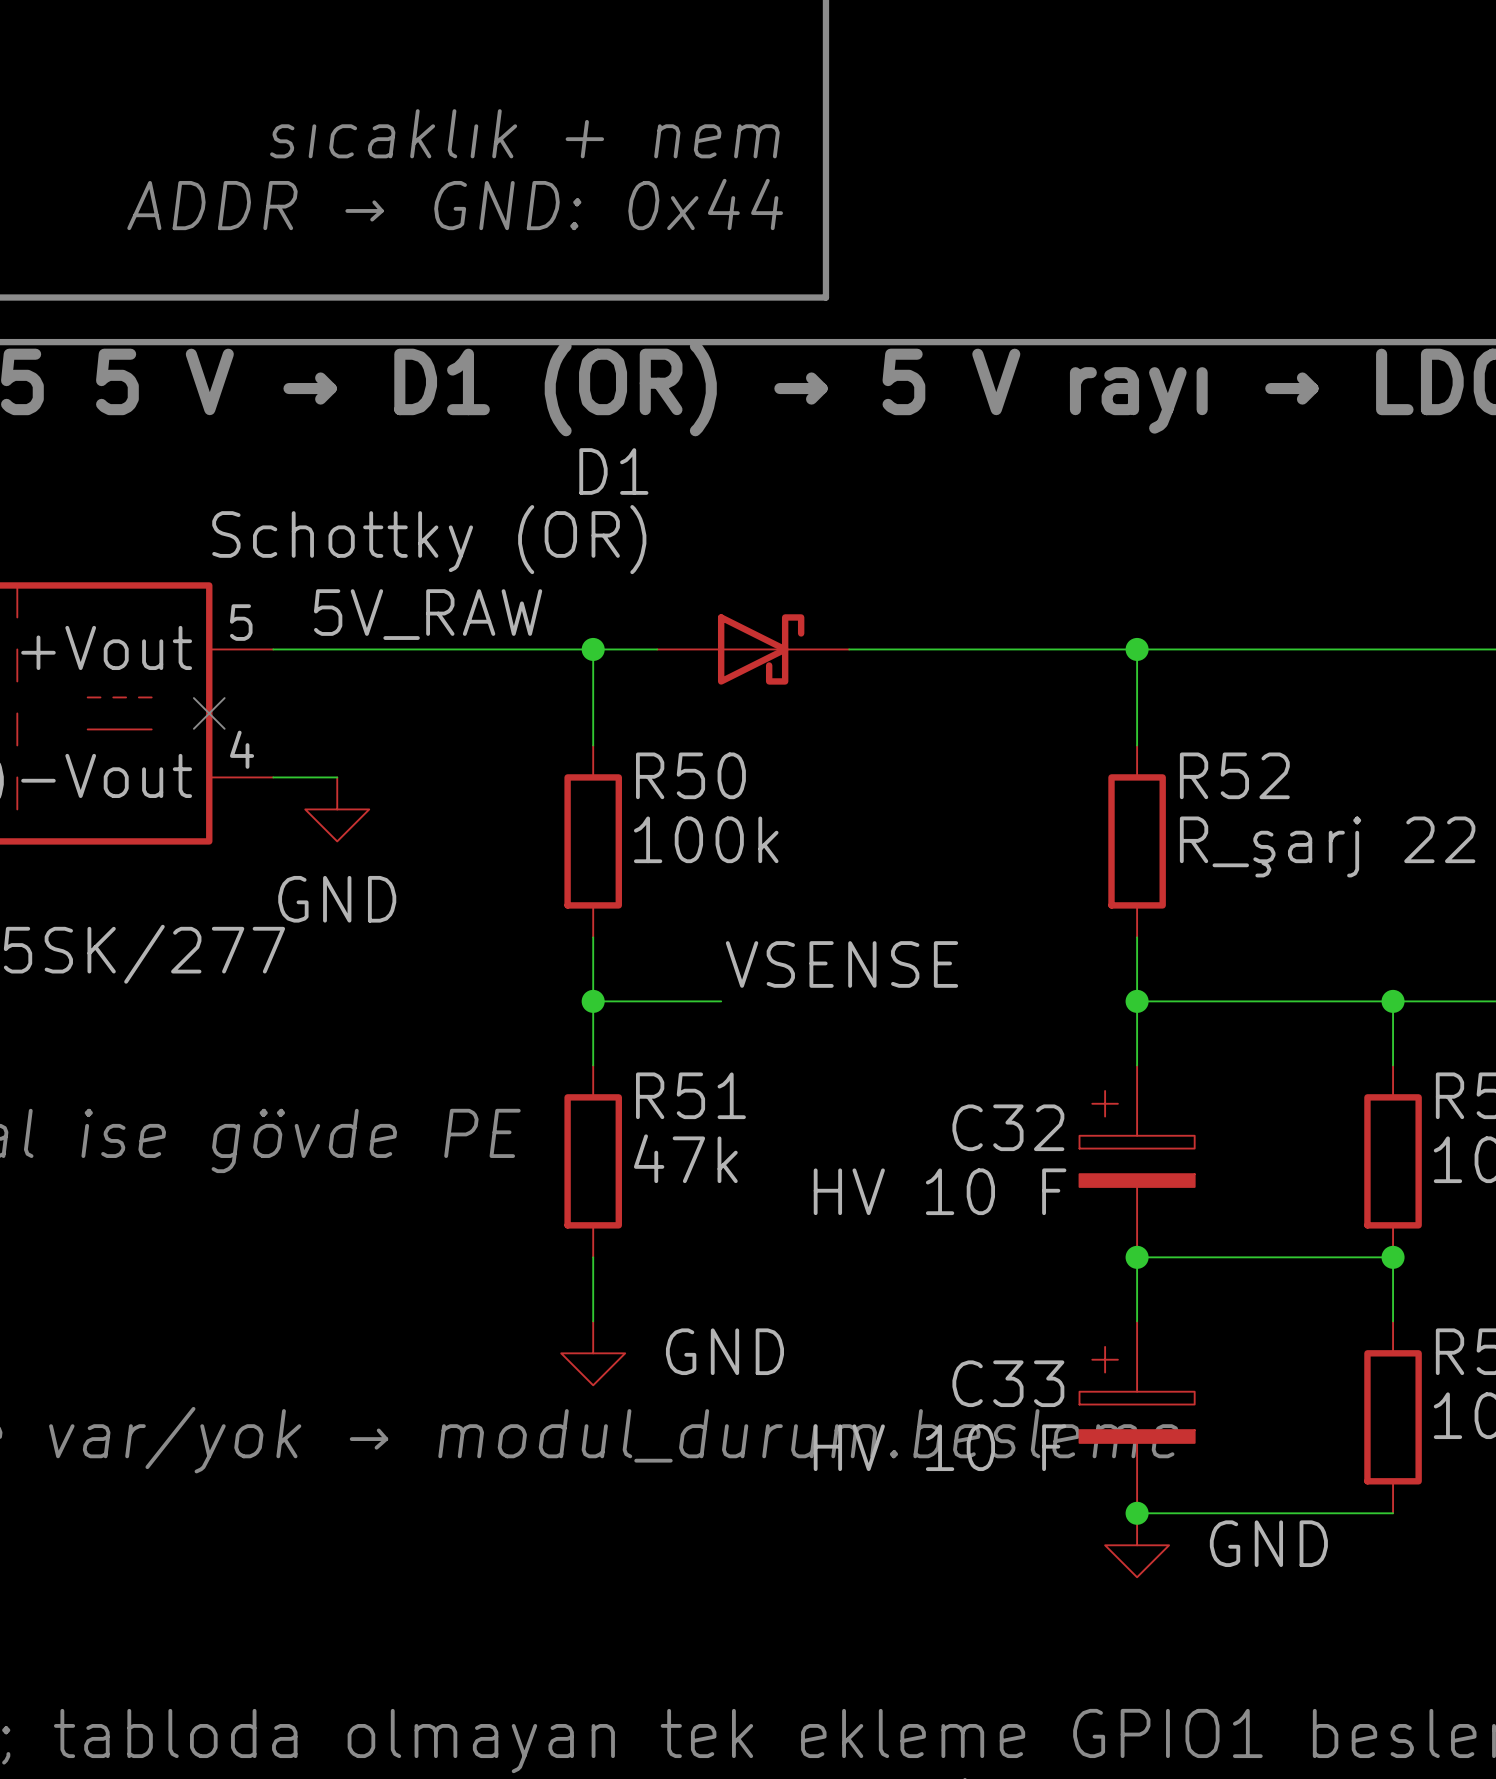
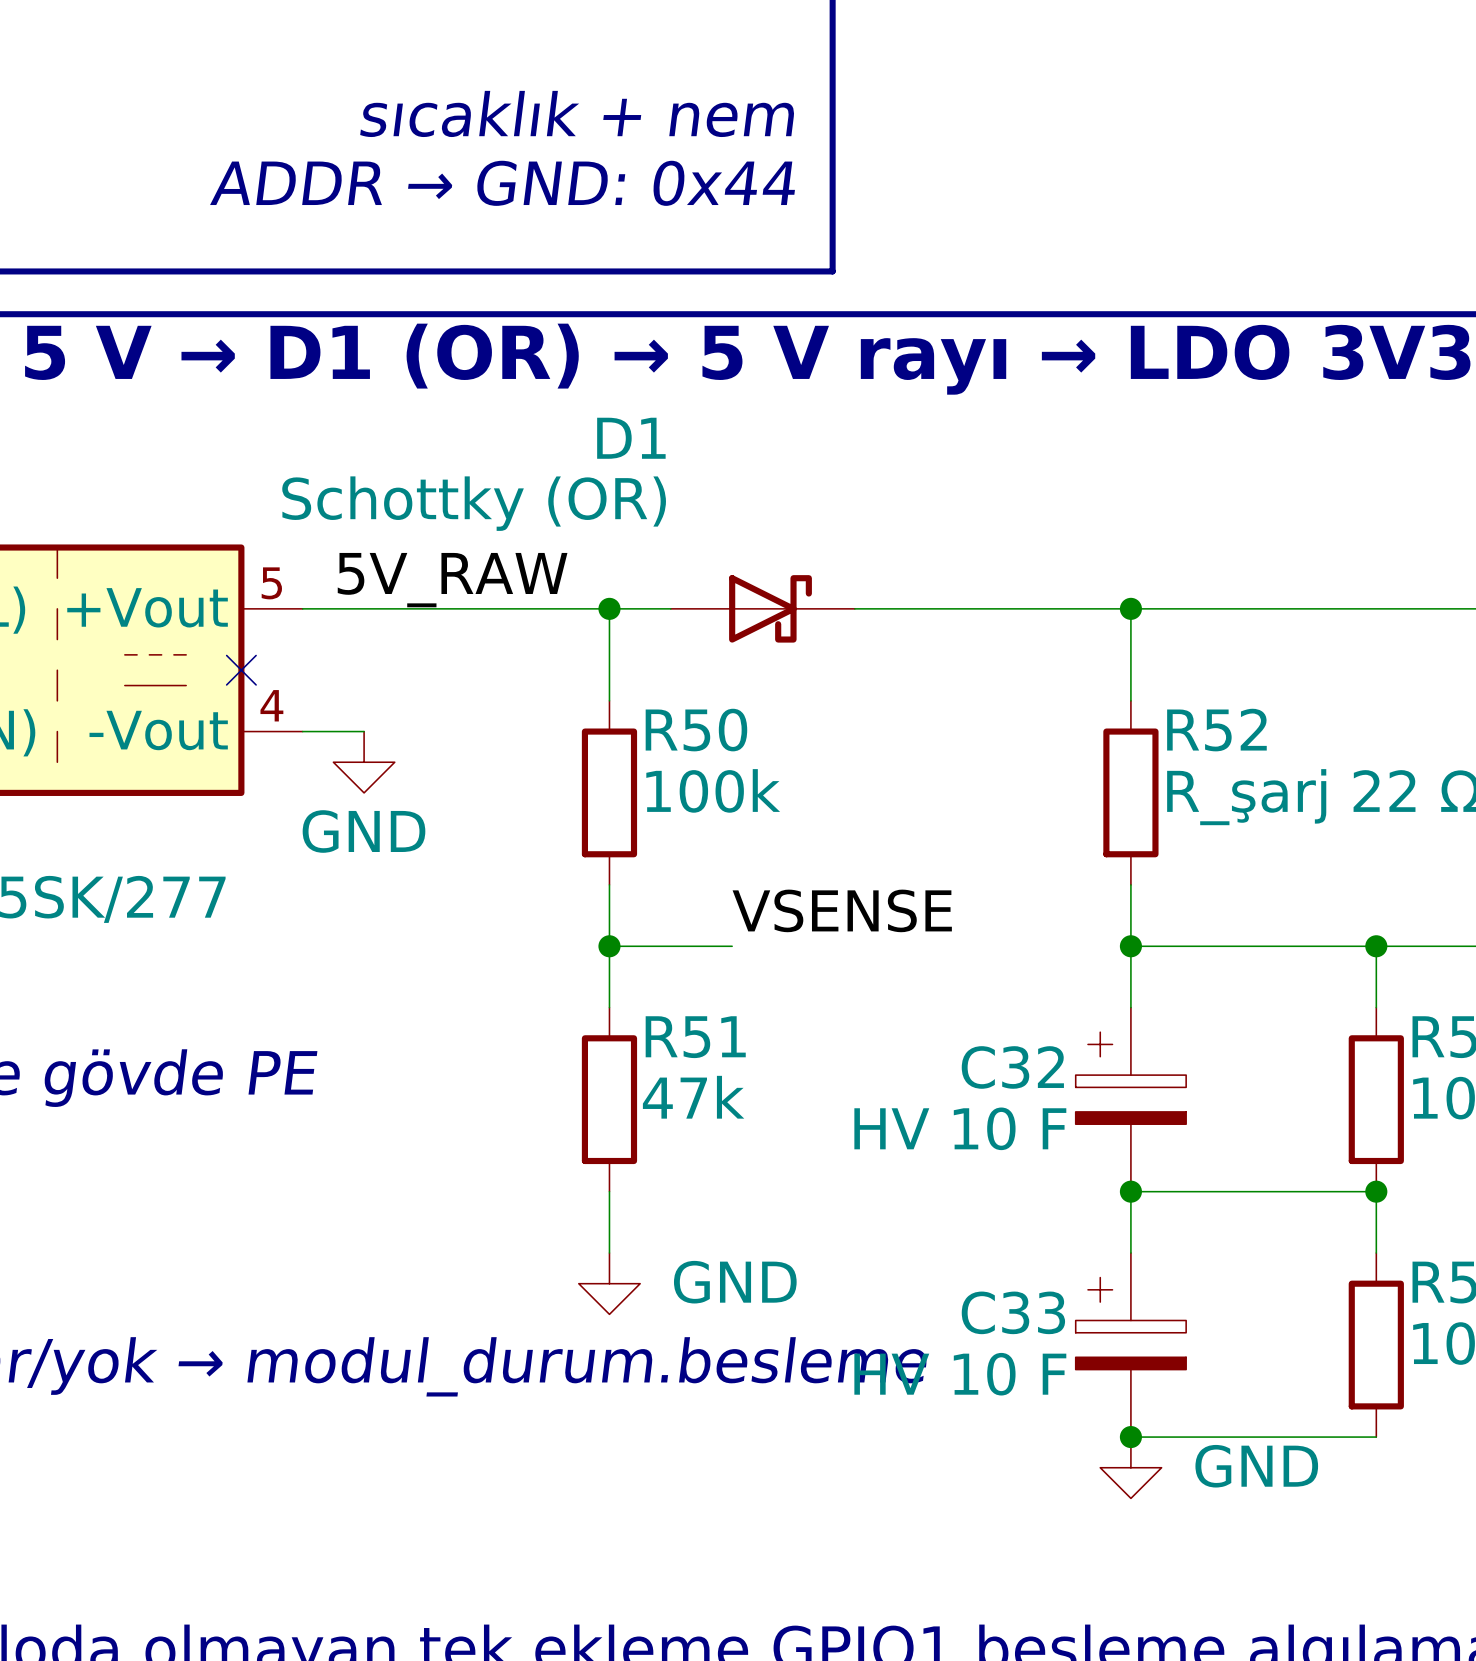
power symbol text position: GND (337, 899) -> GND (363, 831)

